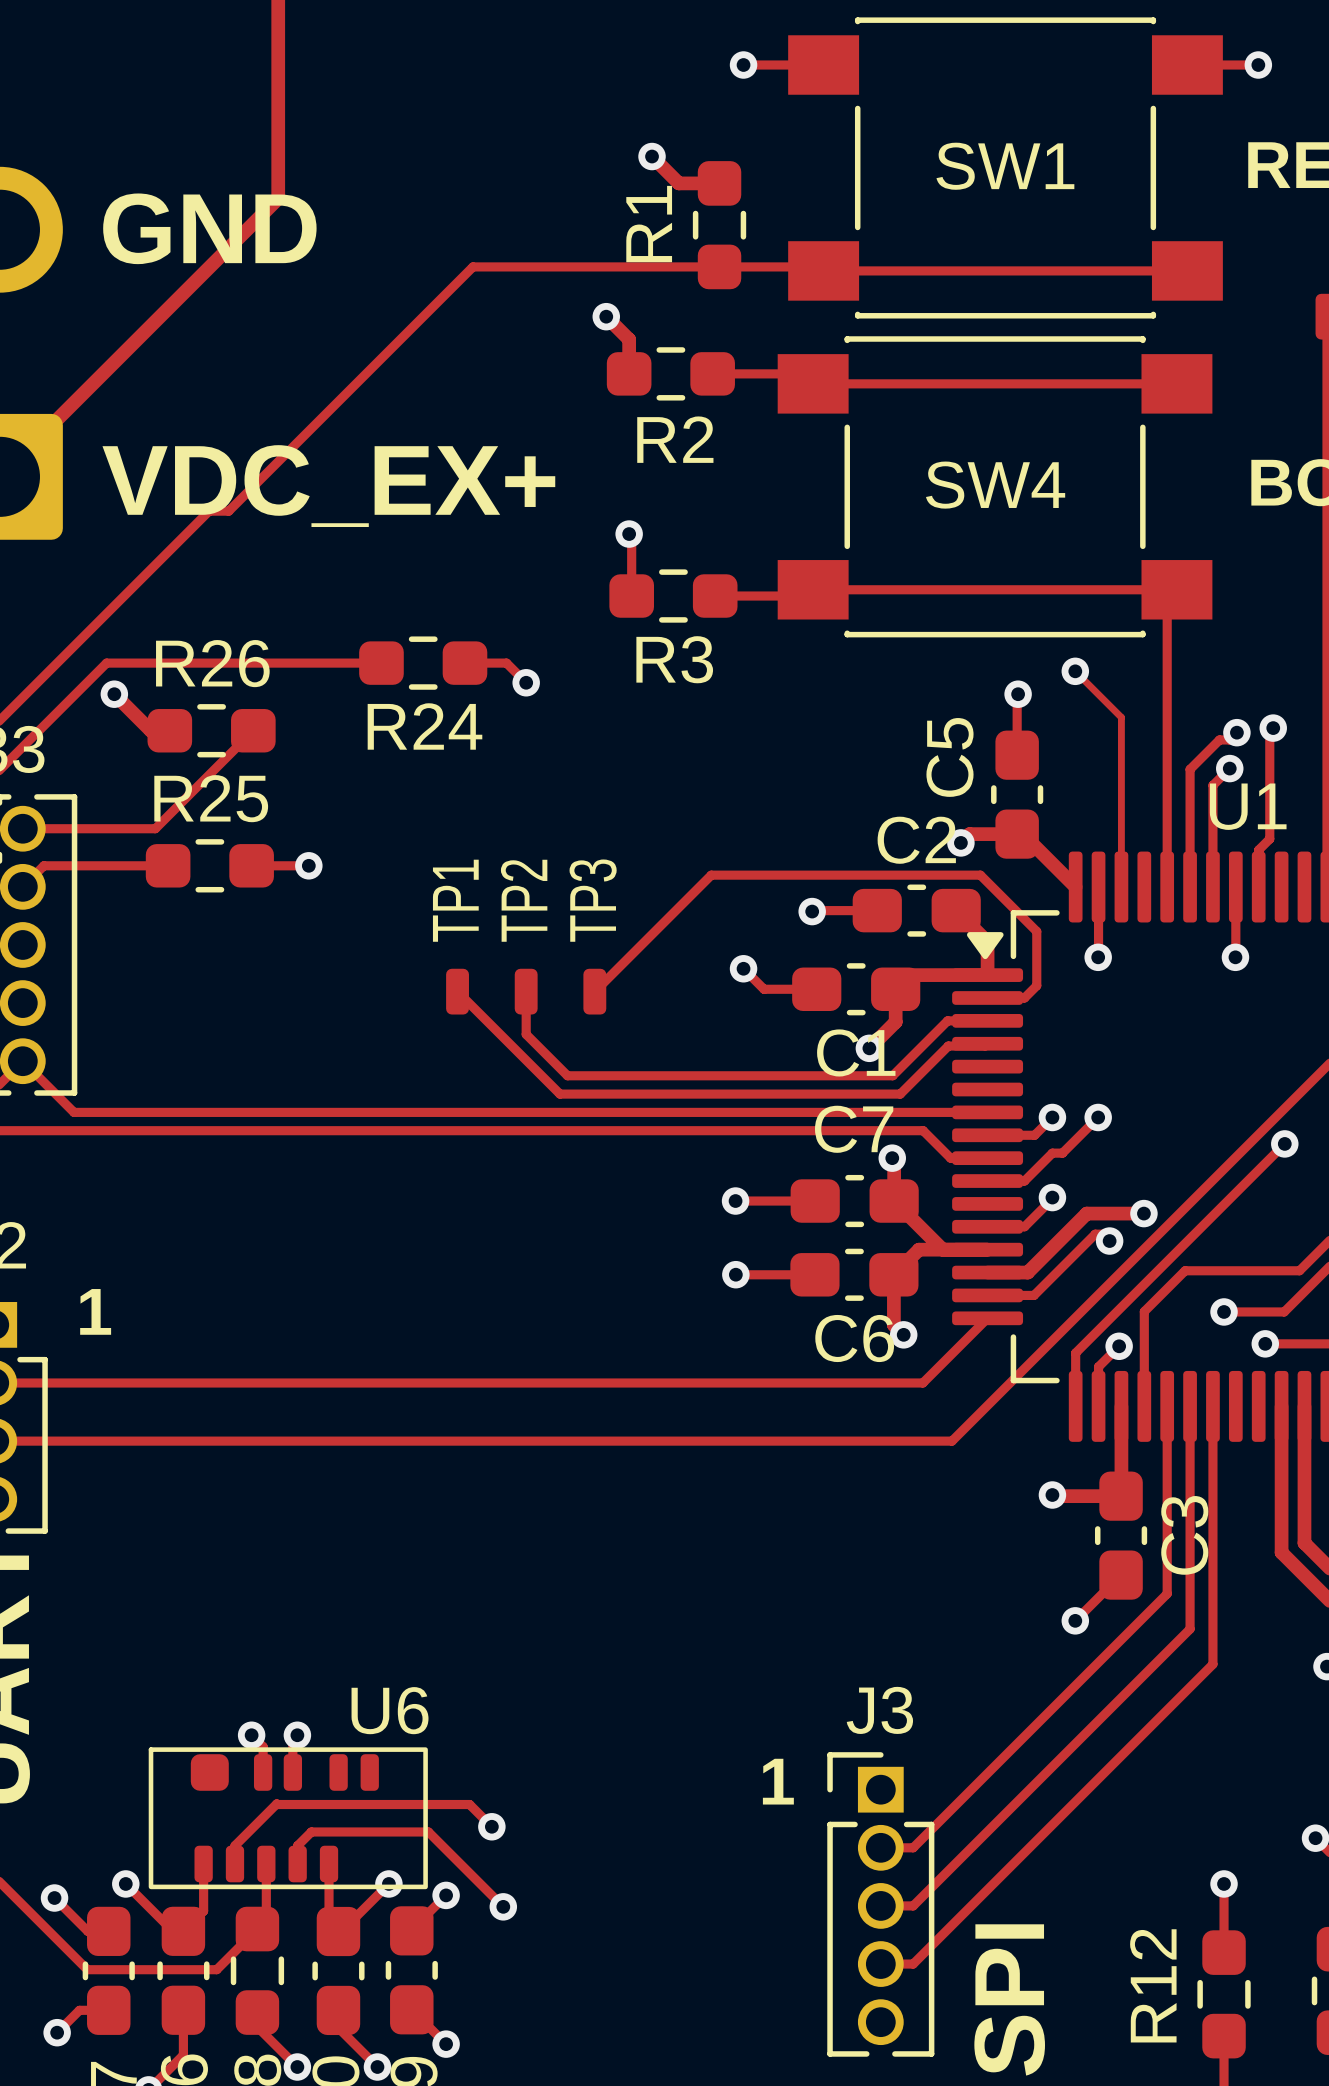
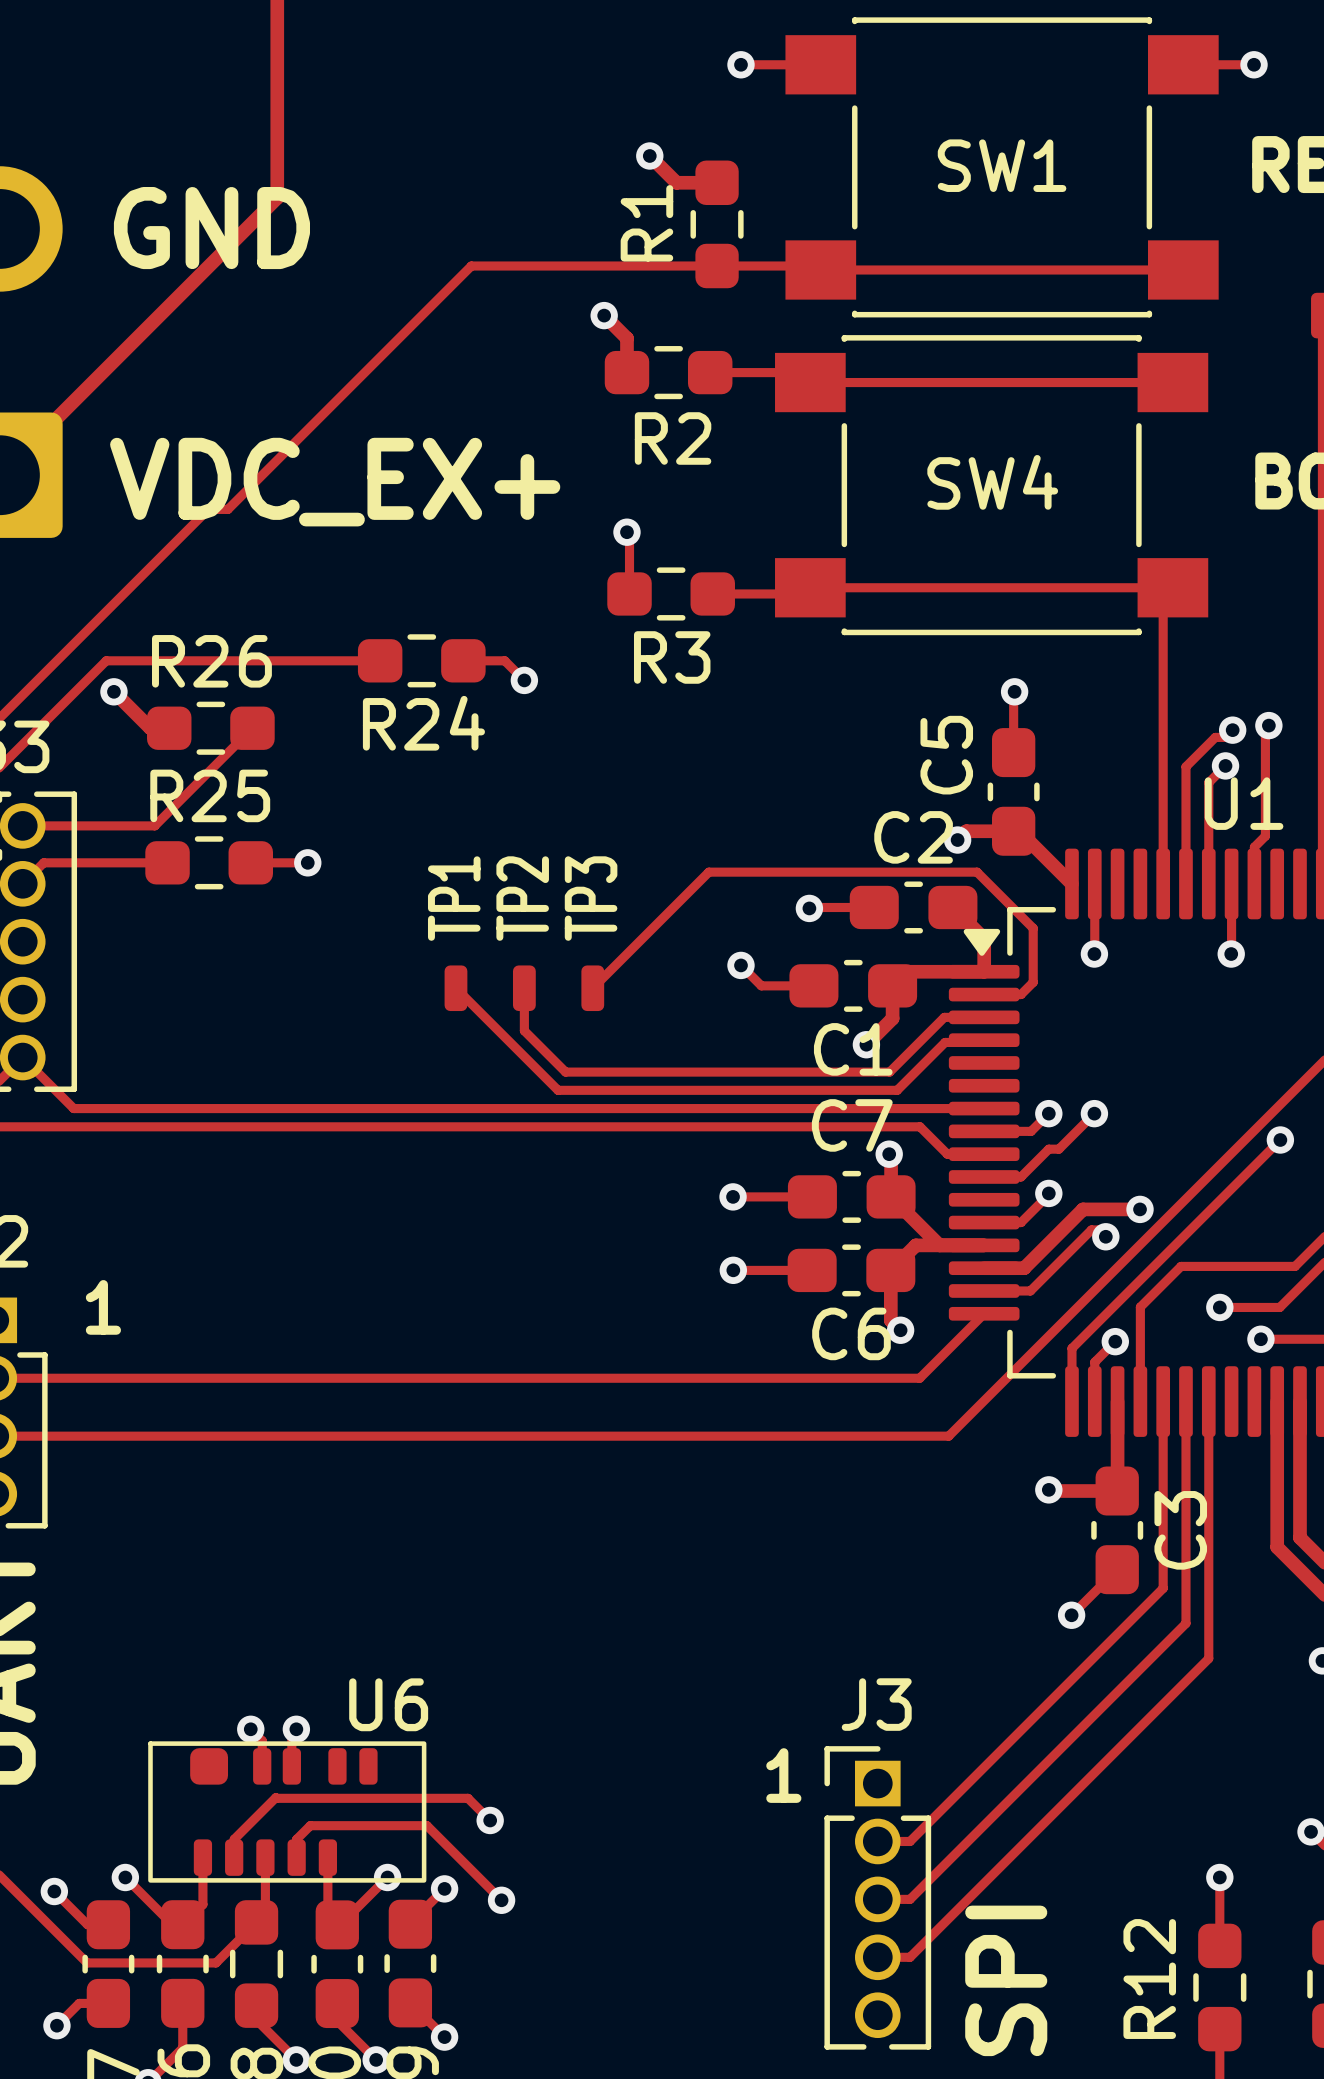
track: (1075, 671) (1121, 717) (1121, 887) -> none
via: (1075, 671) -> none

